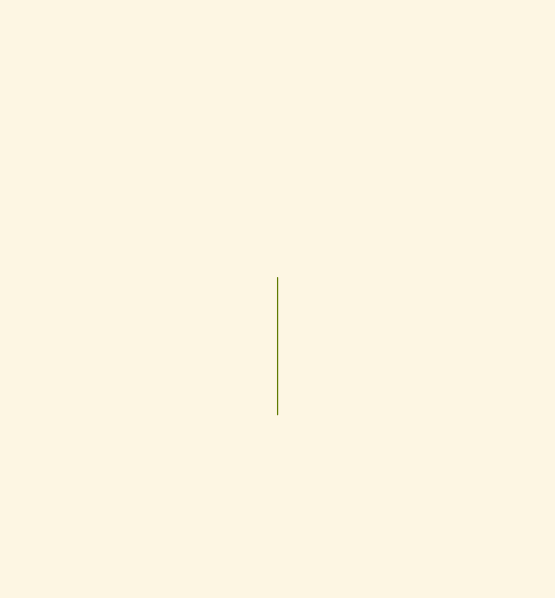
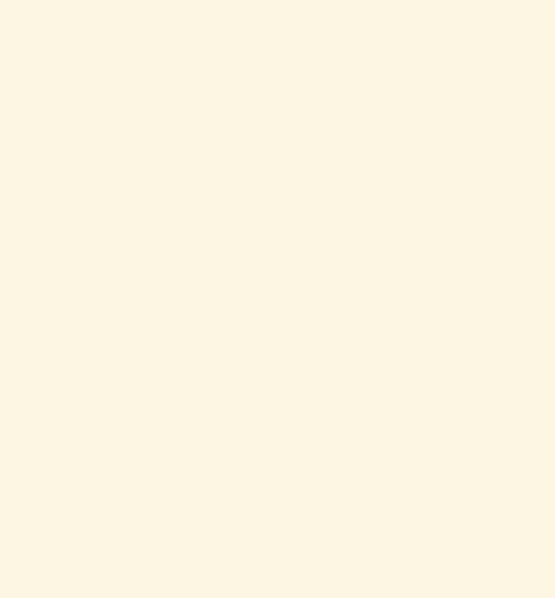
wire: (277, 277) (277, 414) -> none

